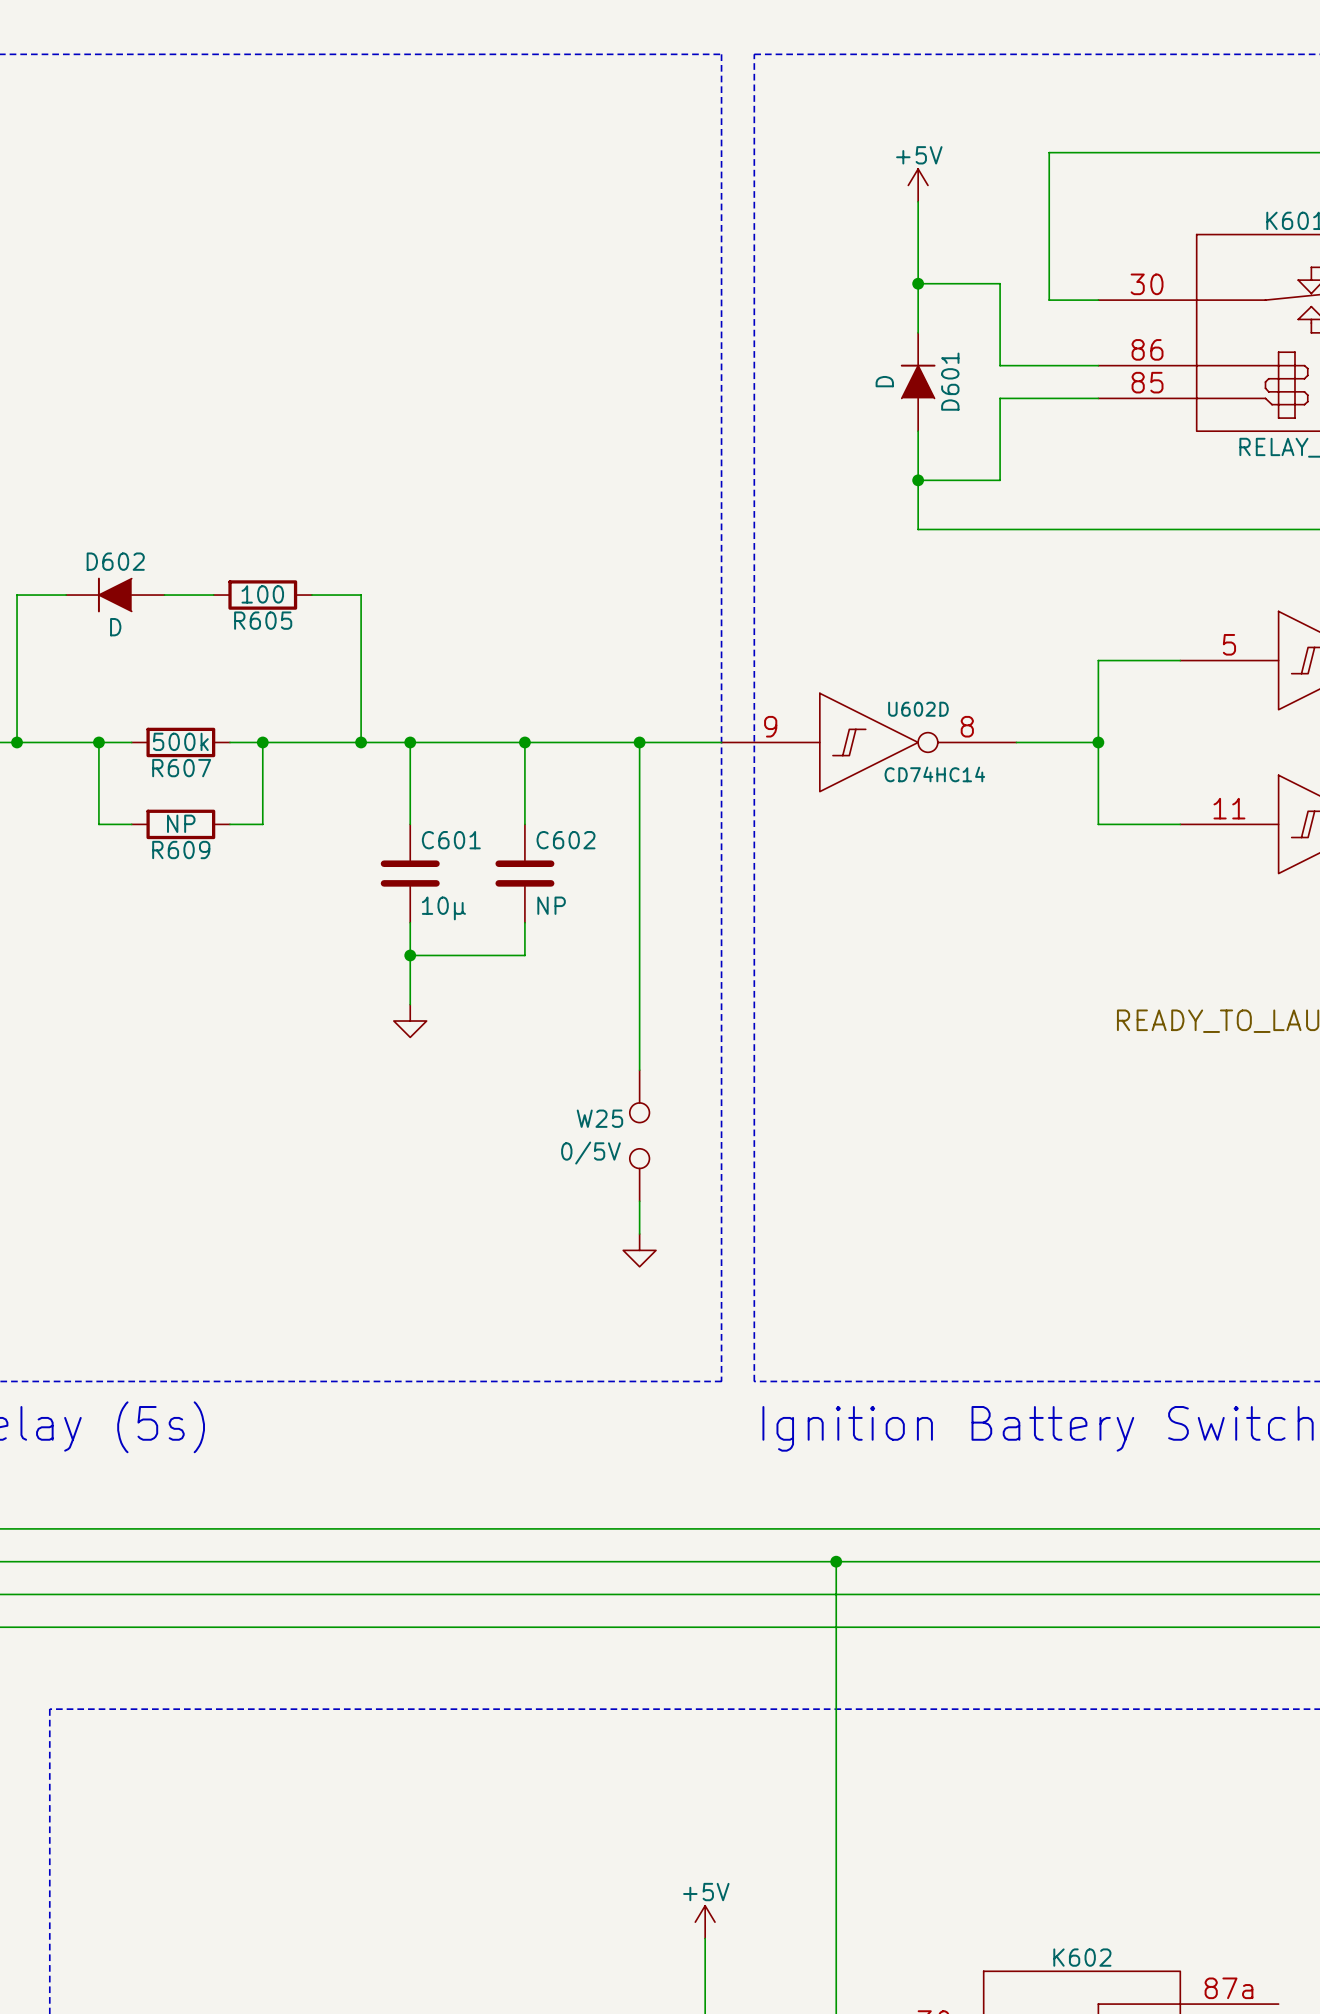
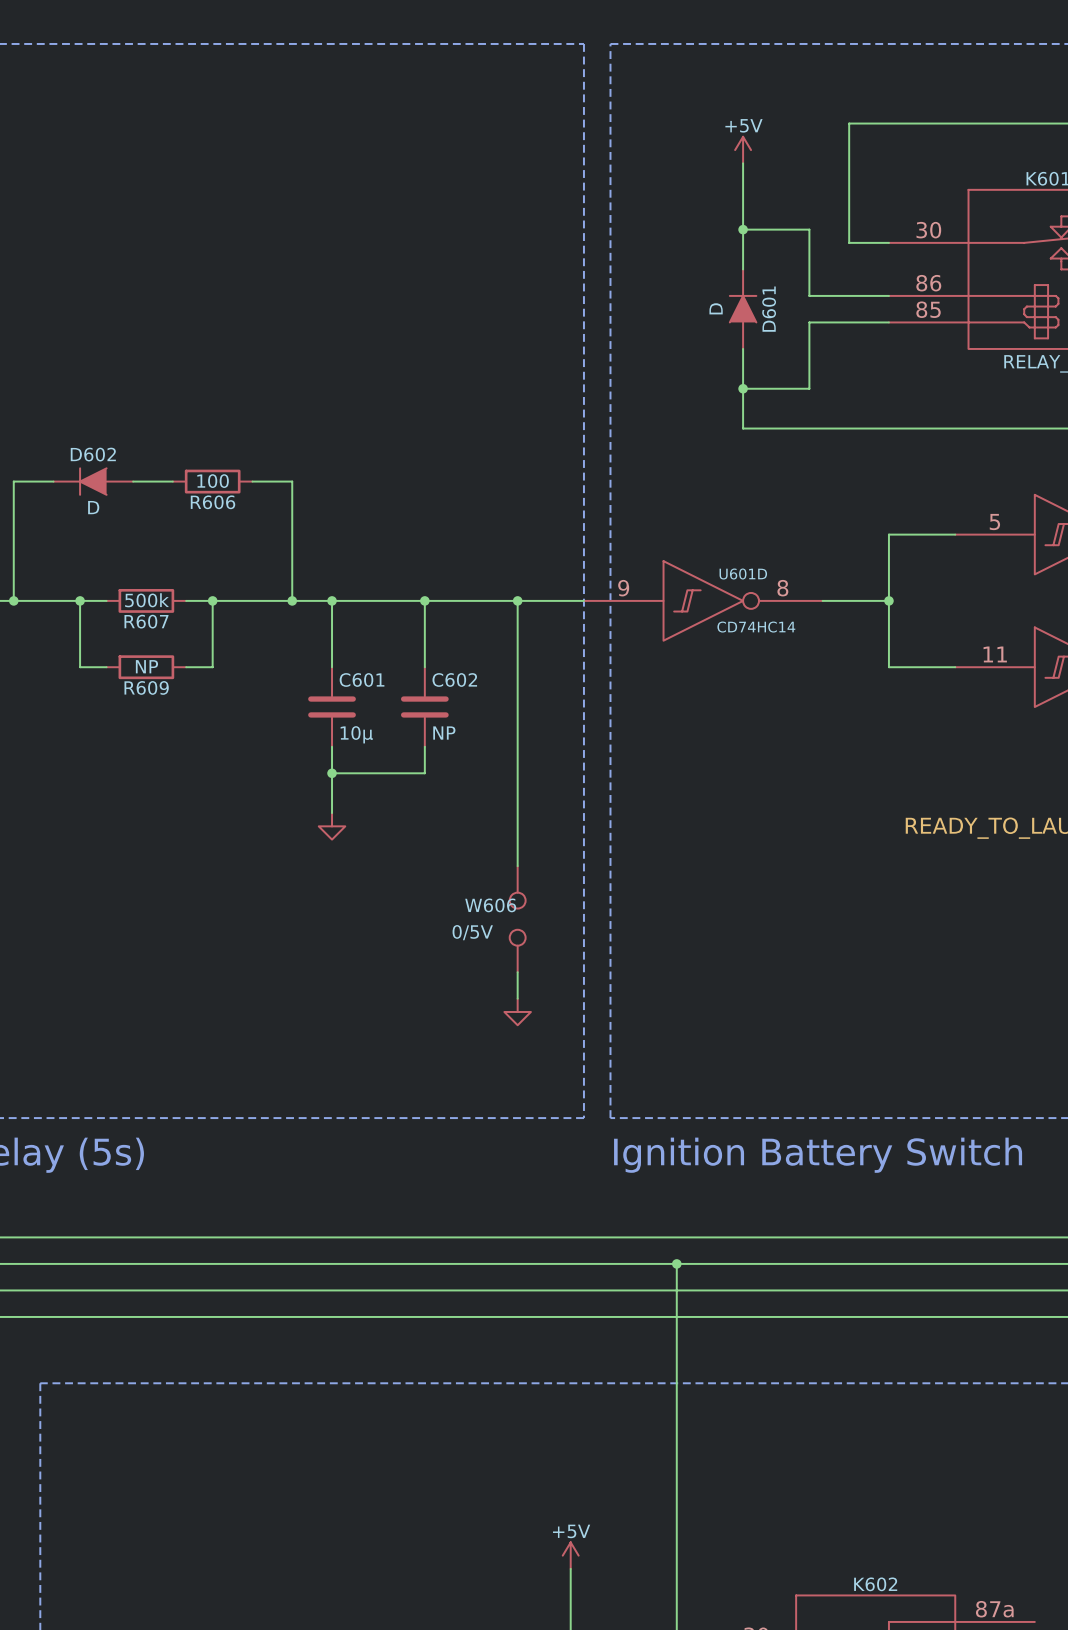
R605 name: R605 (263, 620) -> R606 (213, 502)
U602D name: U602D (918, 709) -> U601D (743, 574)
W25 name: W25 (599, 1118) -> W606 (490, 905)

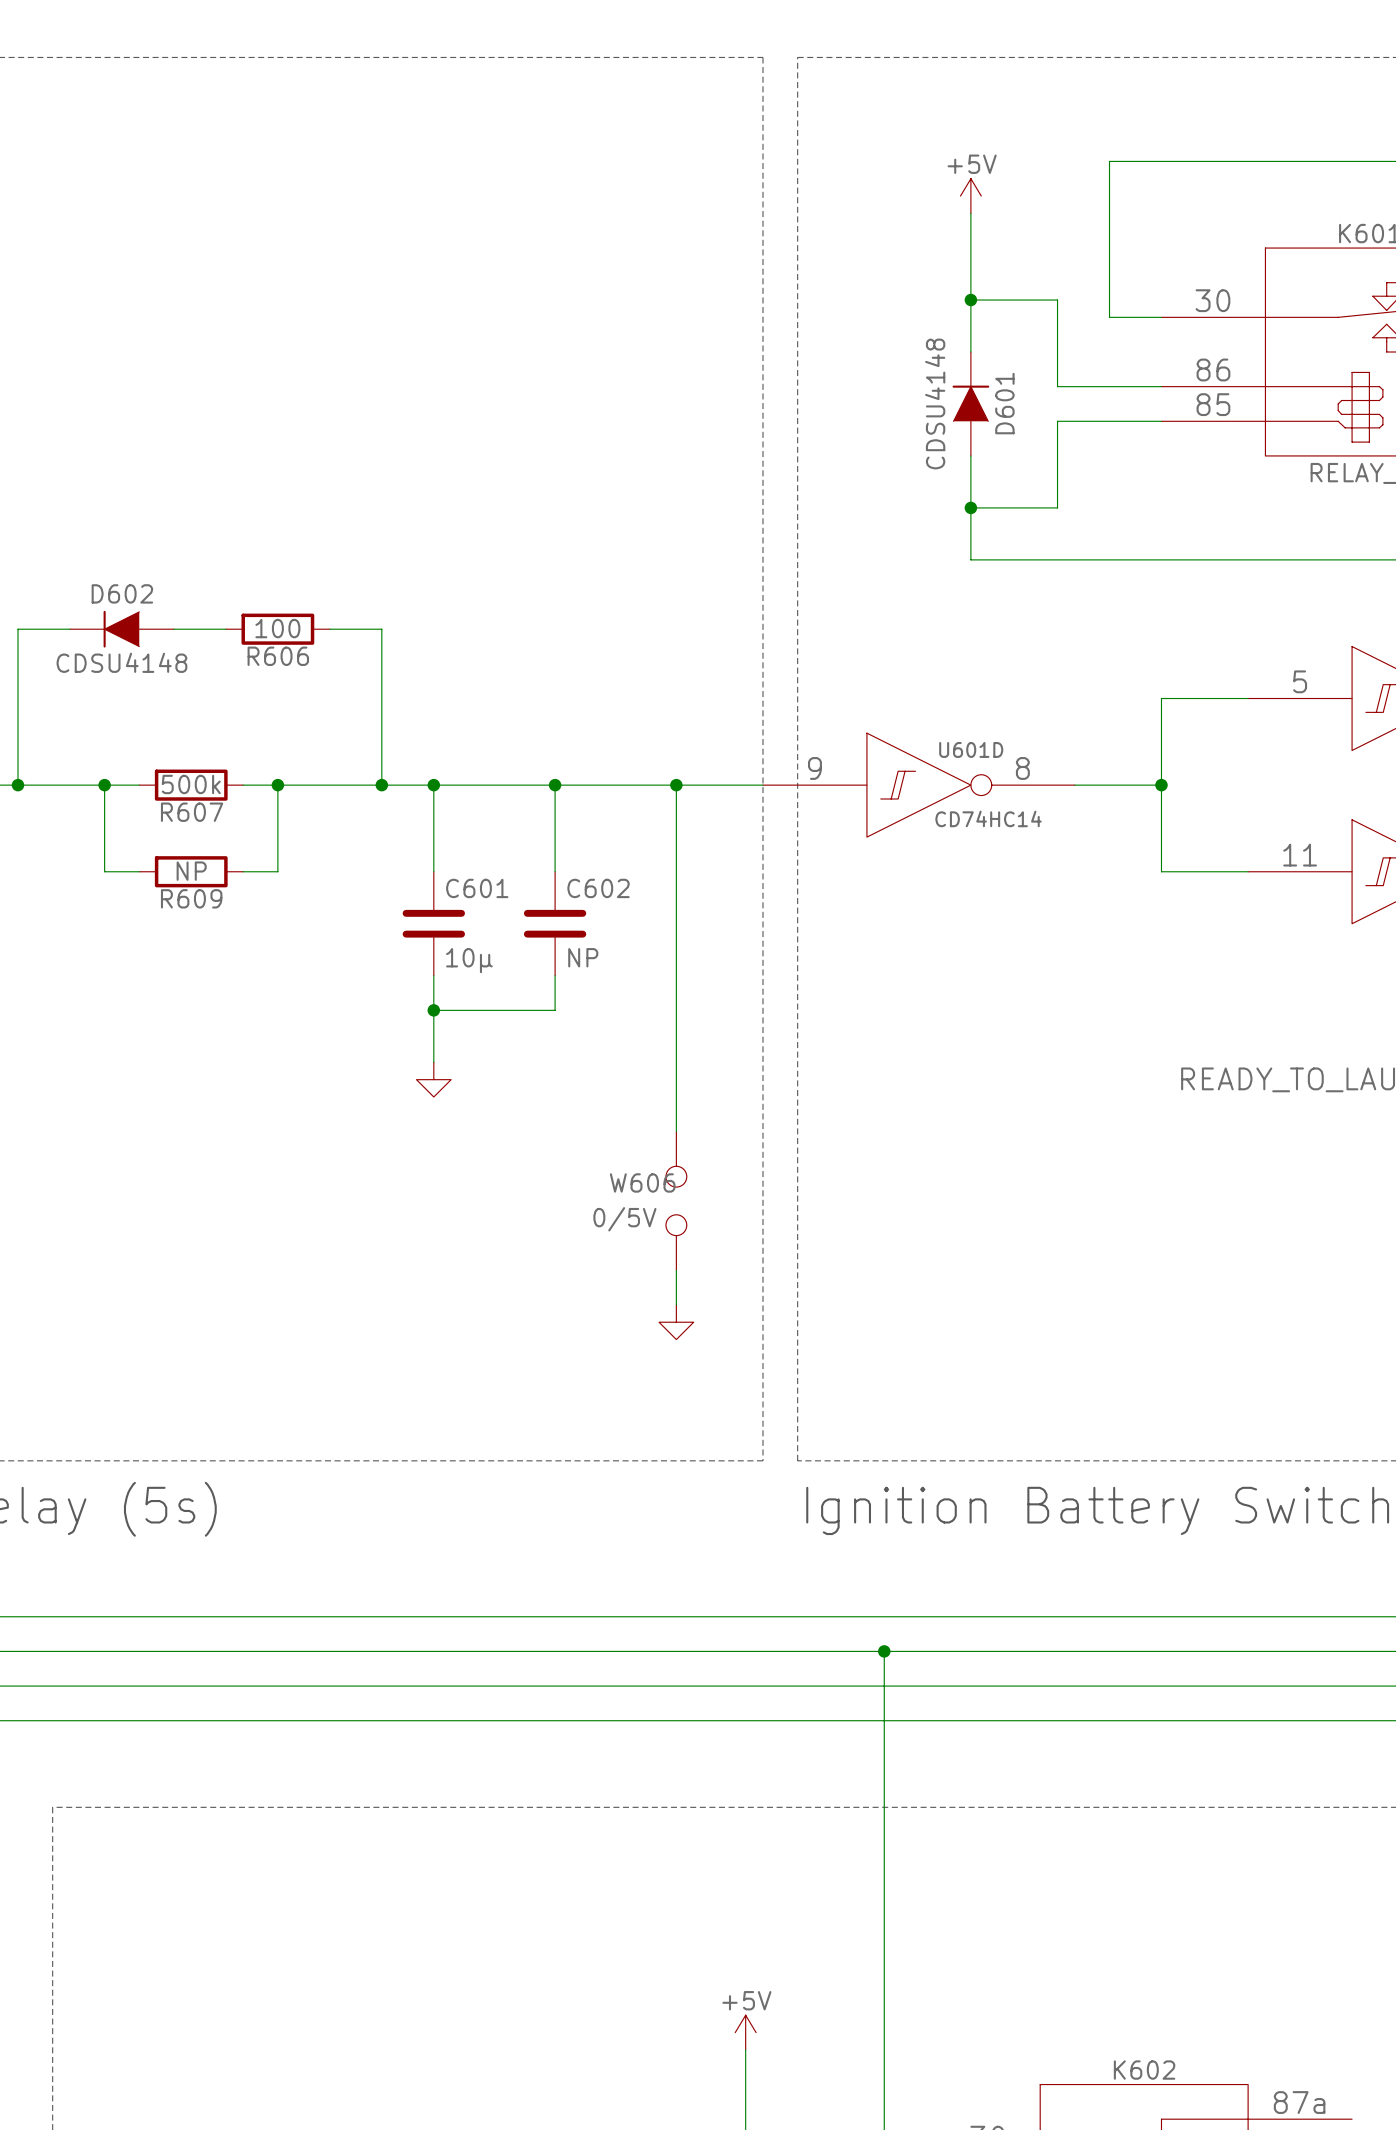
D601 value: D (716, 308) -> CDSU4148 (935, 403)
D602 value: D (93, 507) -> CDSU4148 (121, 662)

